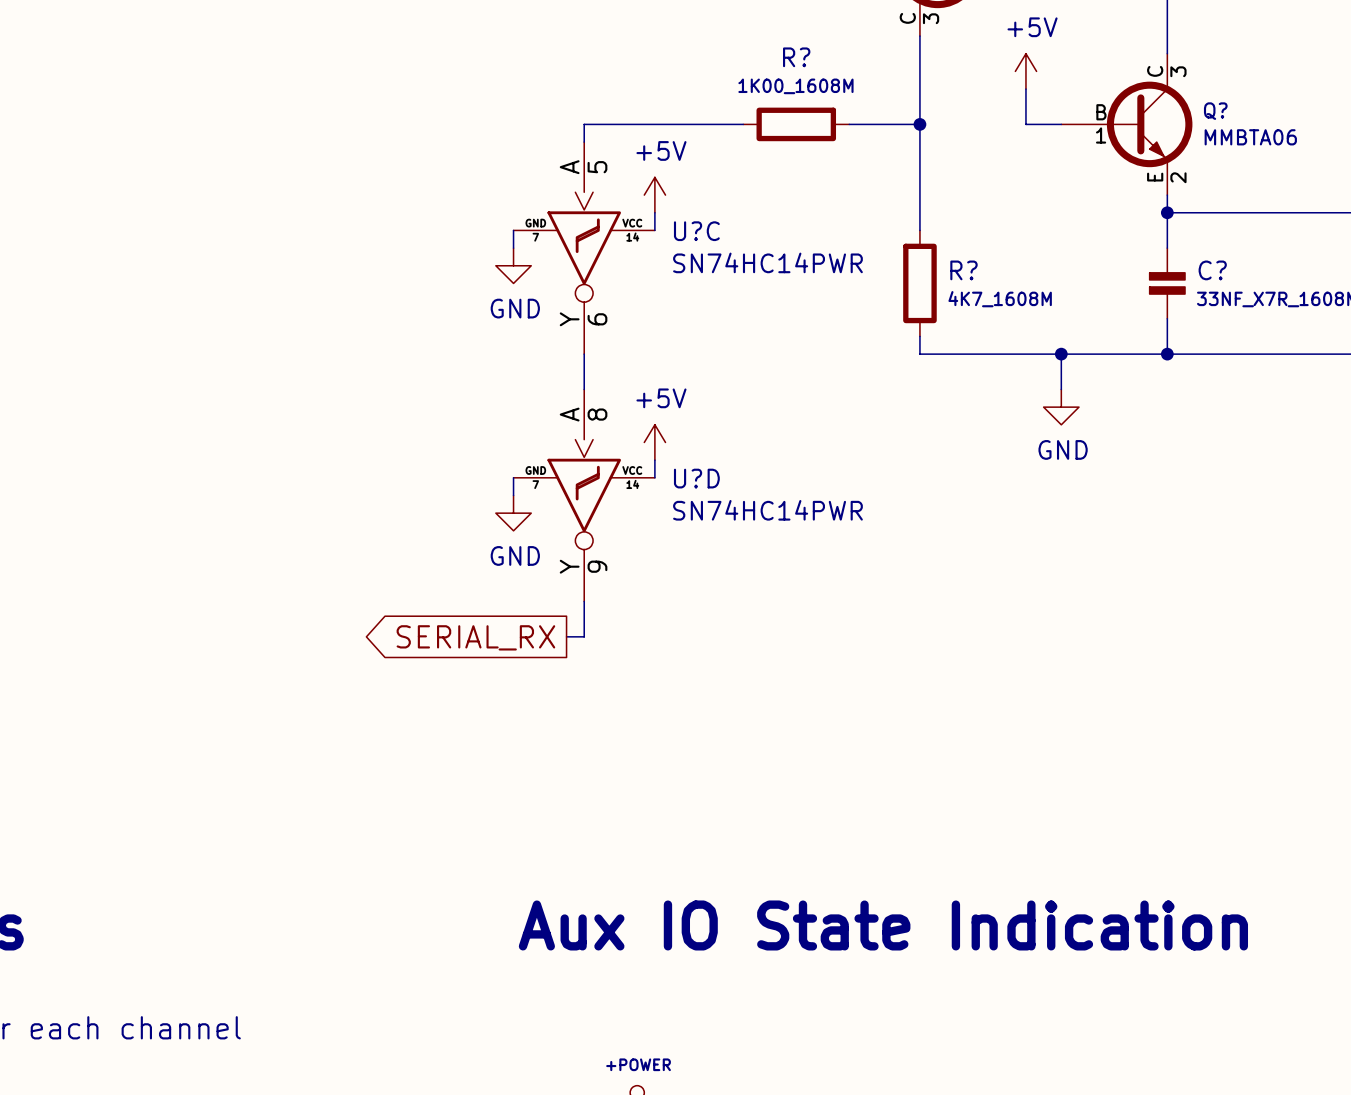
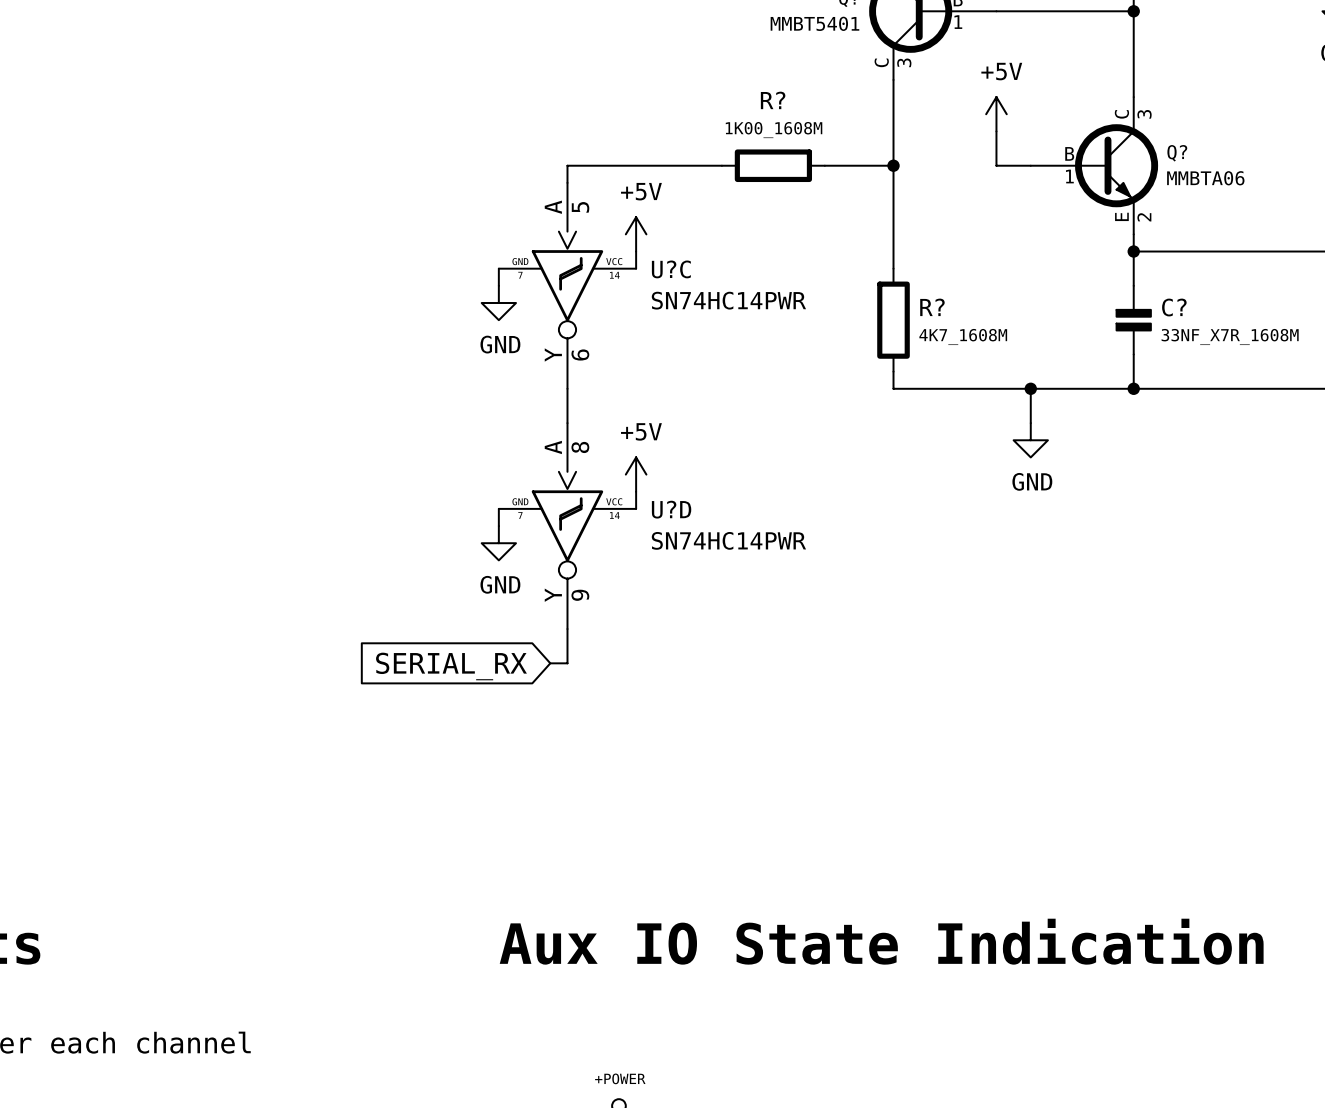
global label shape: output (475, 637) -> input (451, 666)

